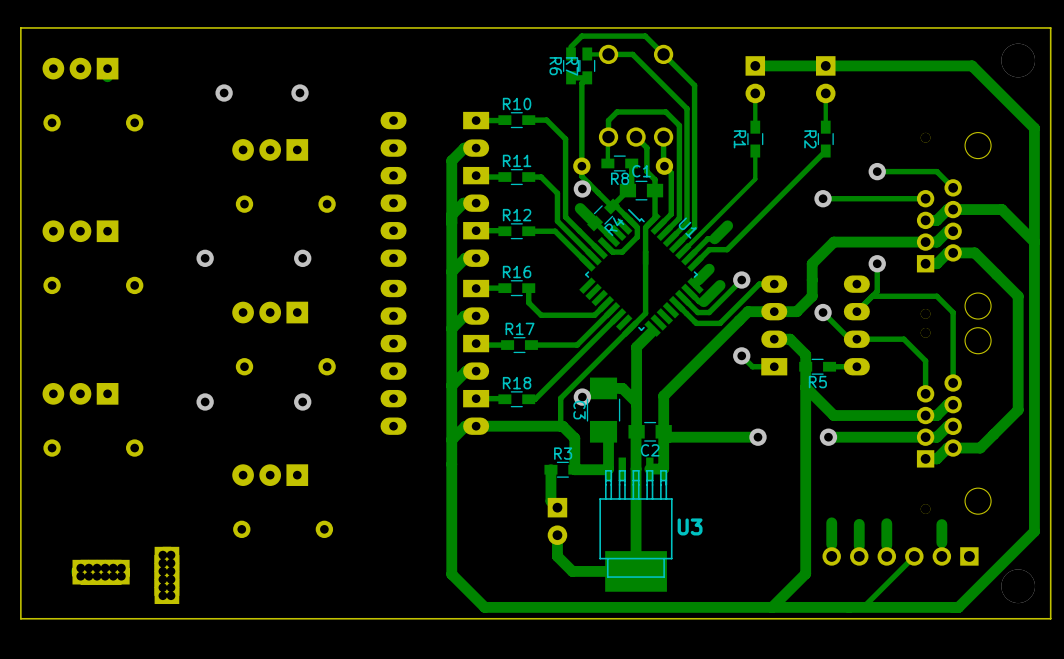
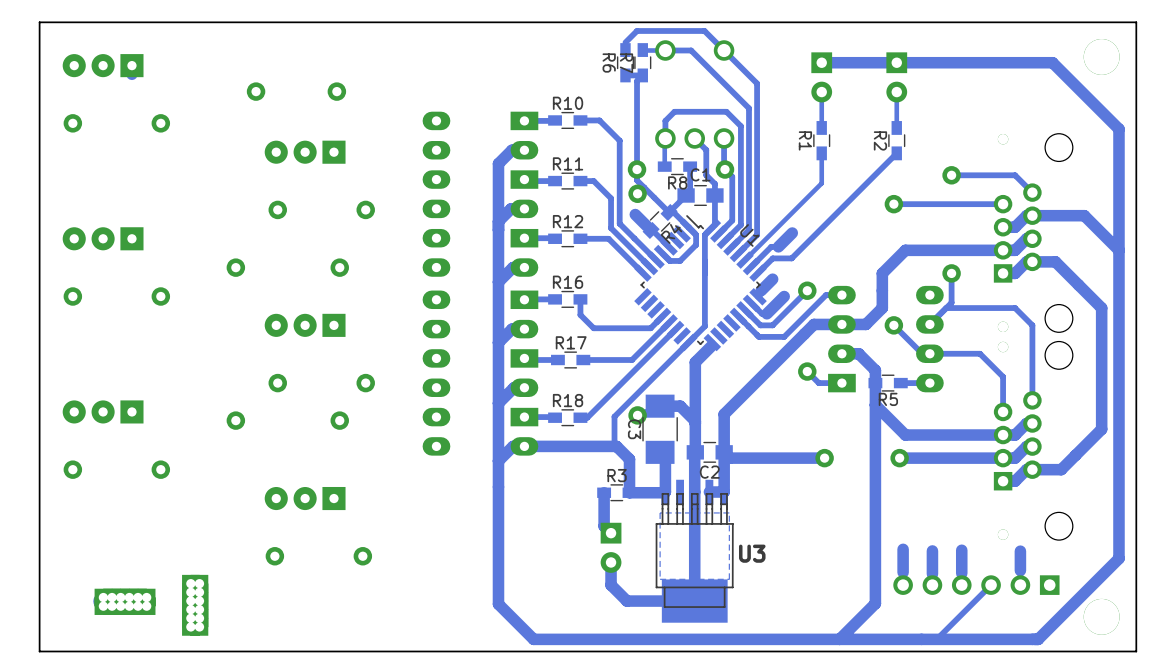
zone outline: none -> (729, 512) (729, 579) (660, 579) (660, 512) (729, 512)

